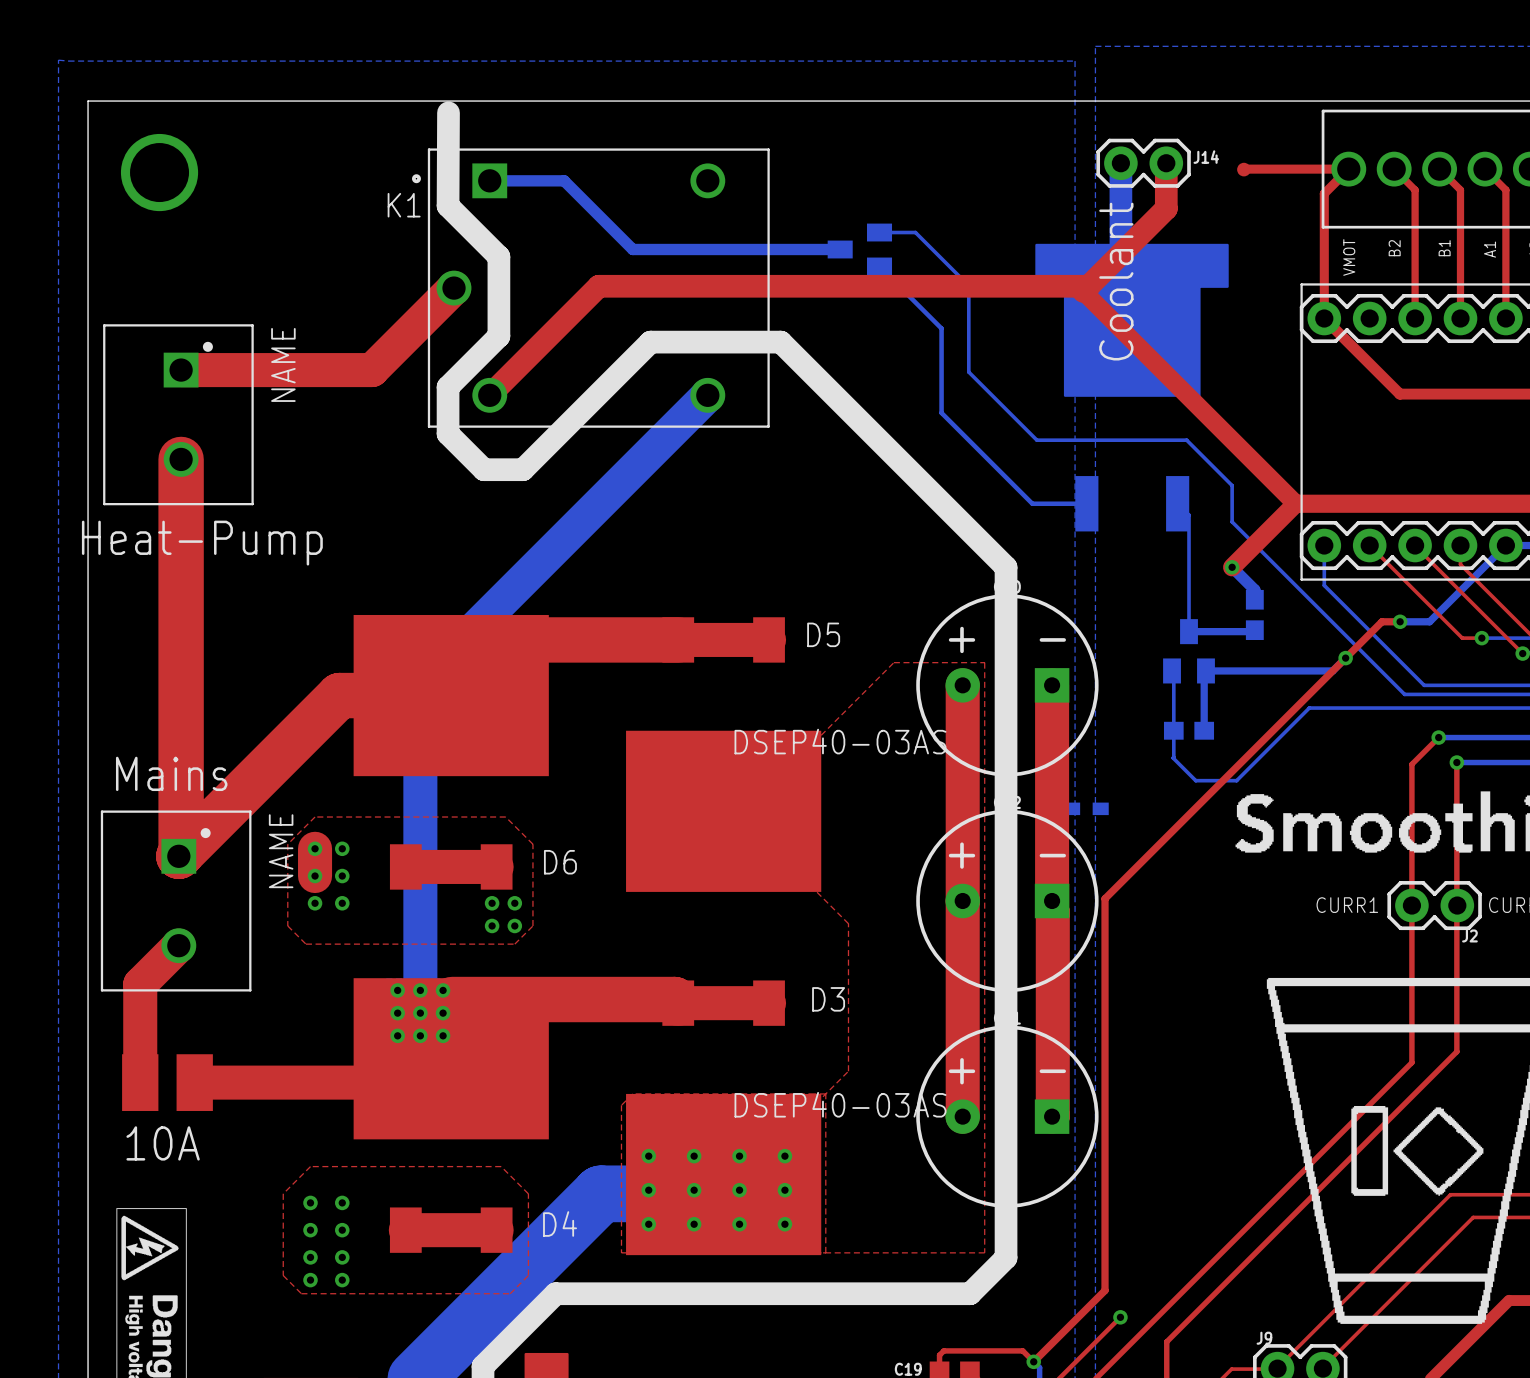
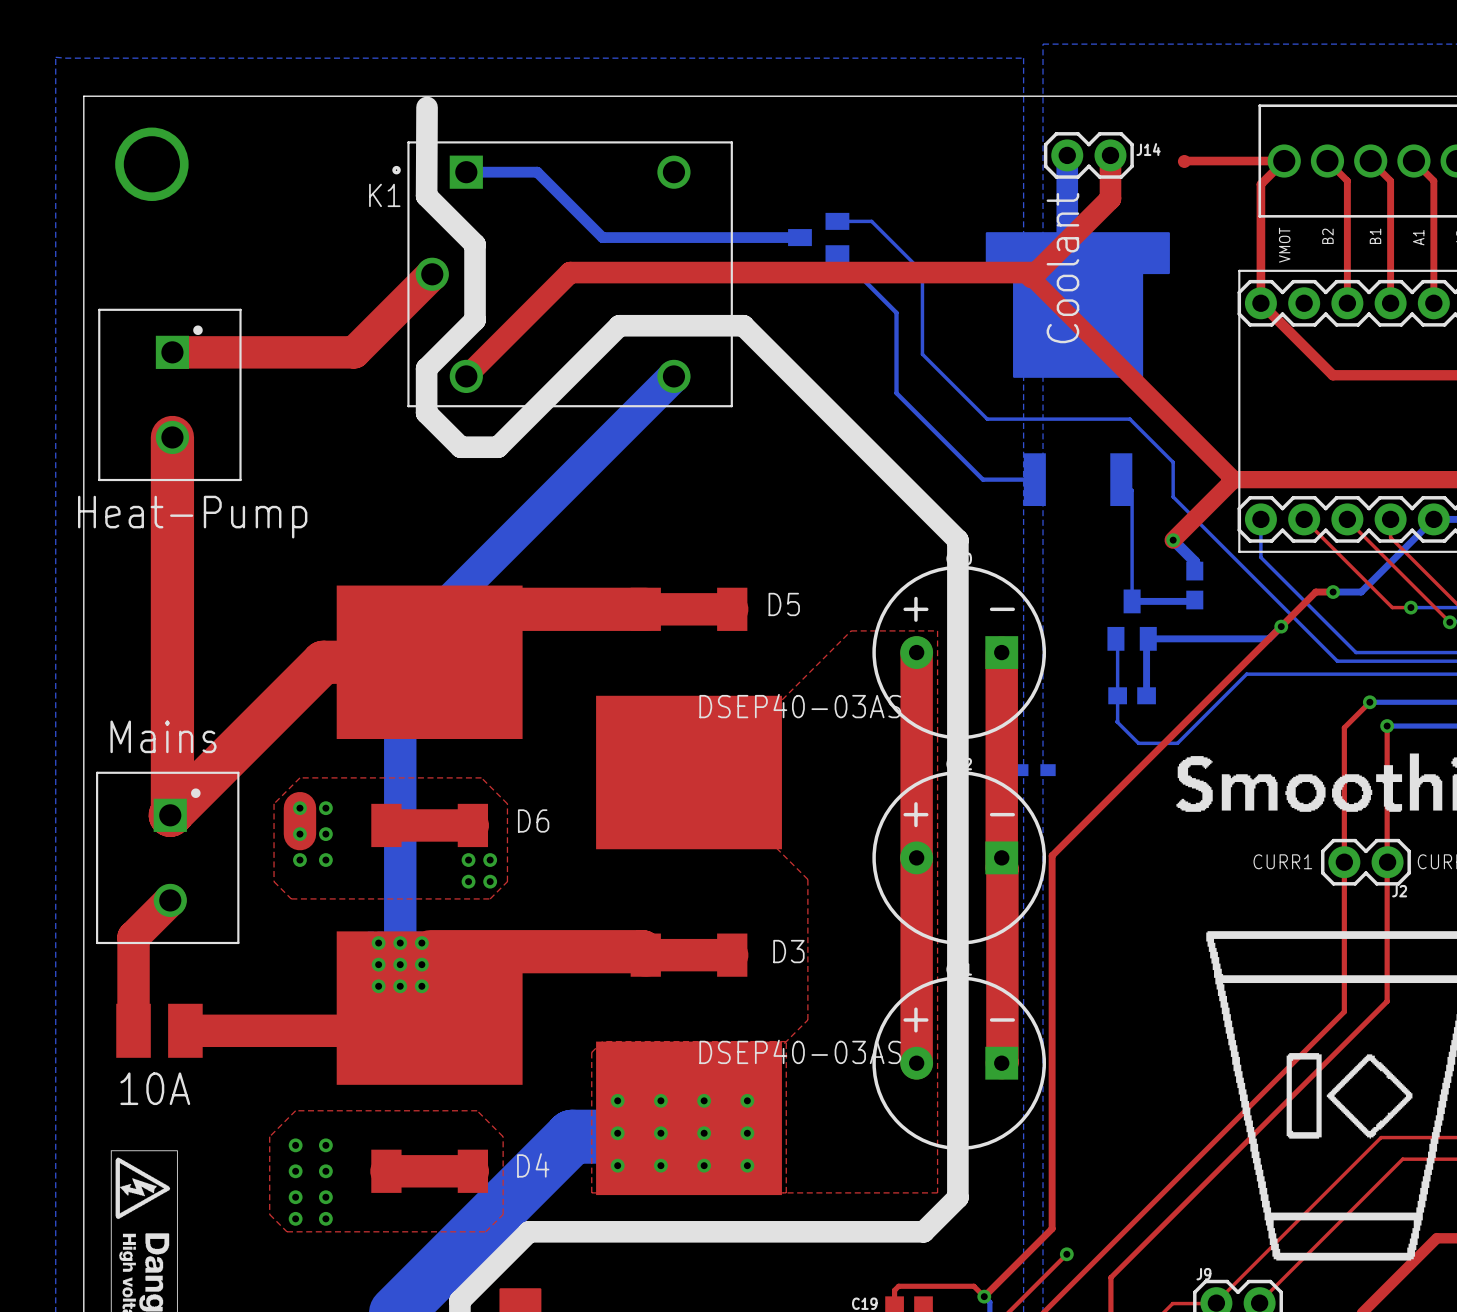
part text: NAME (283, 364) -> none
part text: NAME (281, 851) -> none

